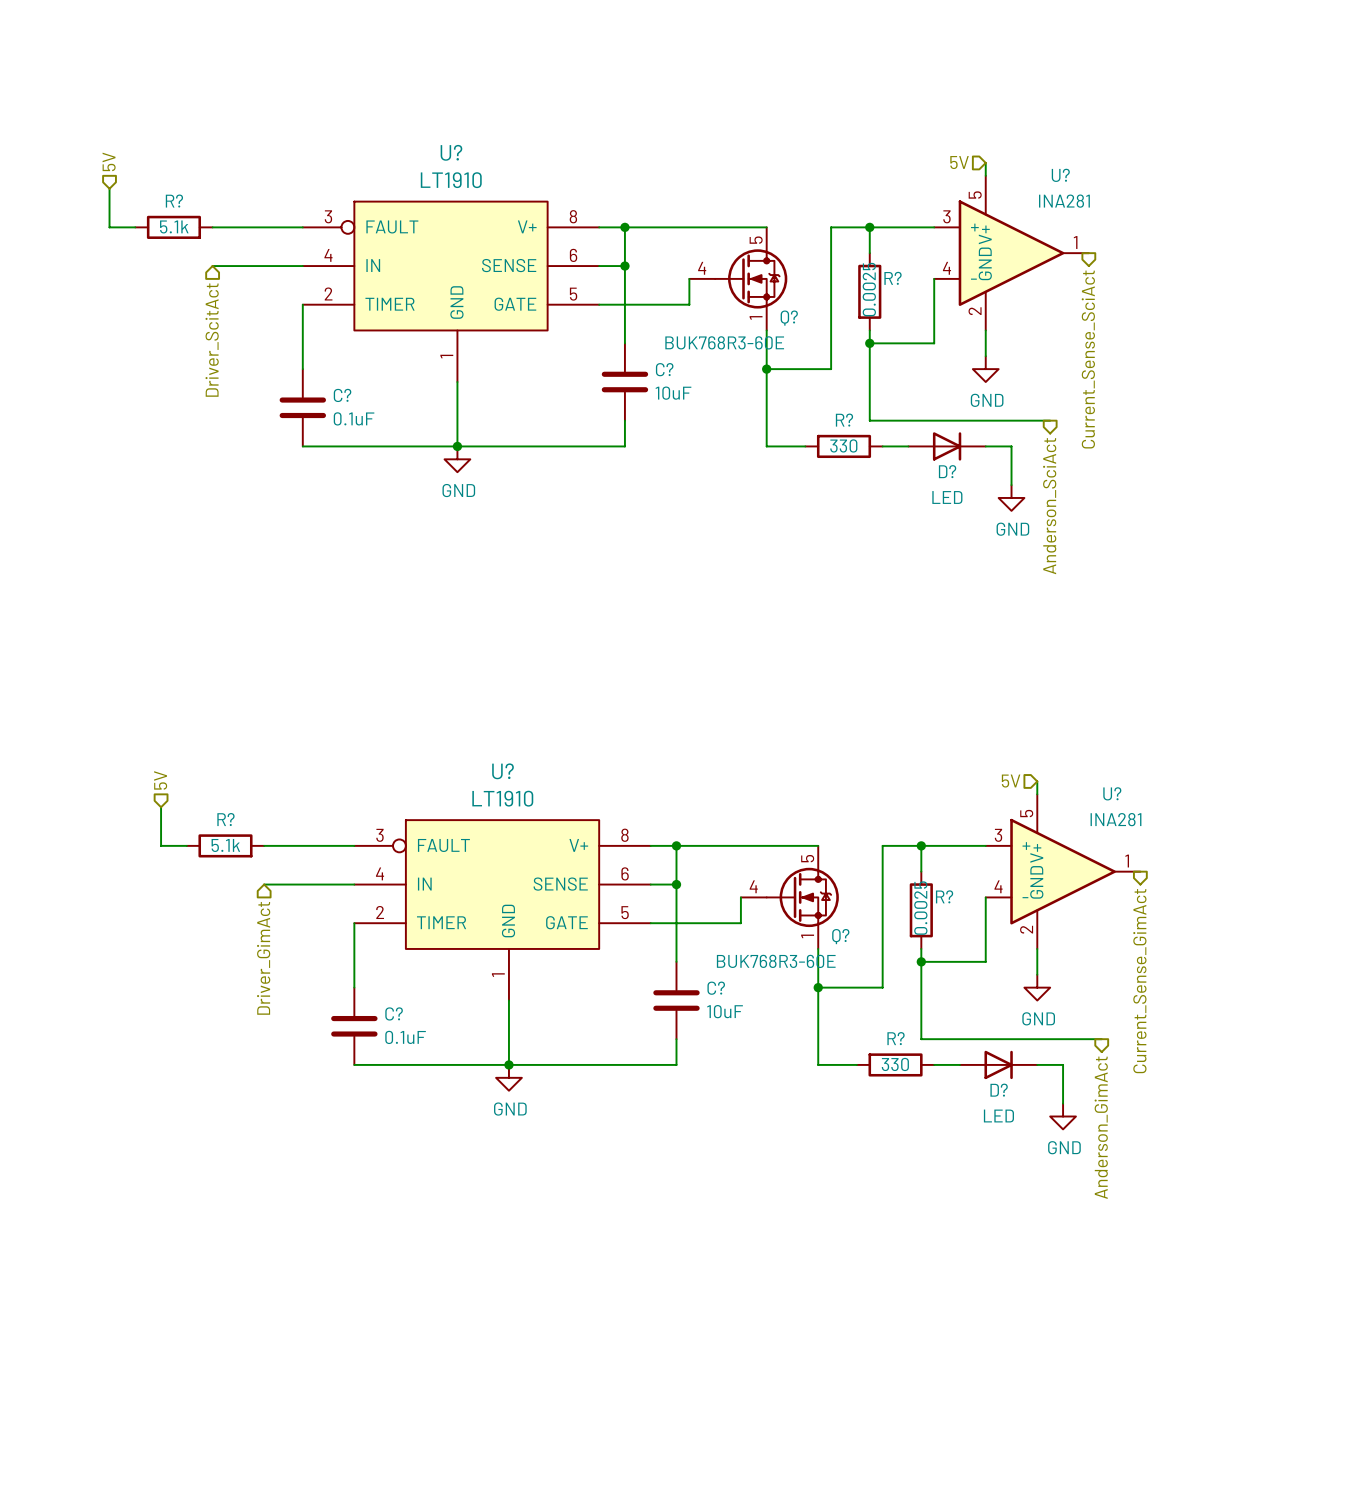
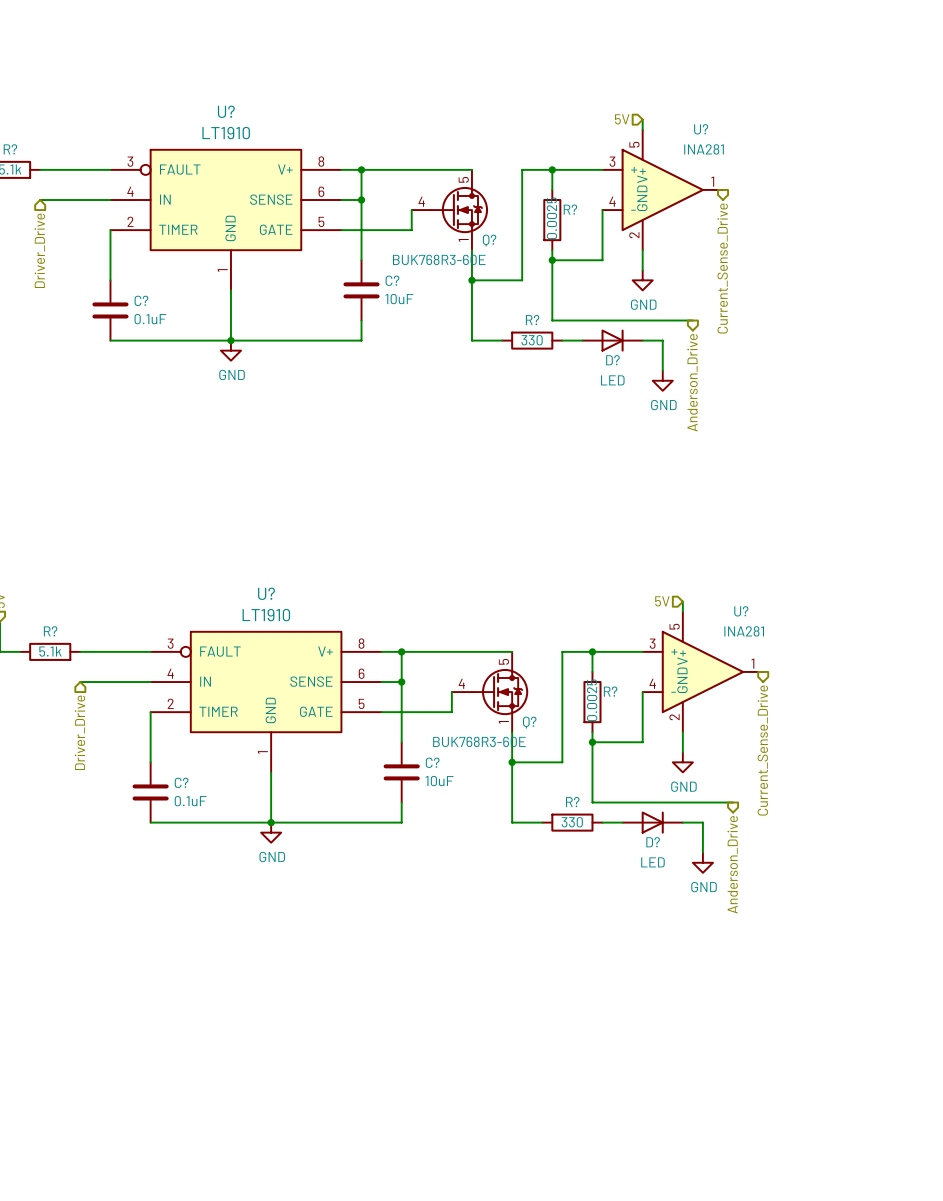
hierarchical label: Driver_ScitAct (212, 340) -> Driver_Drive (39, 250)
hierarchical label: Current_Sense_SciAct (1088, 359) -> Current_Sense_Drive (722, 268)
hierarchical label: Anderson_SciAct (1049, 506) -> Anderson_Drive (692, 382)
hierarchical label: Driver_GimAct (263, 958) -> Driver_Drive (79, 732)
hierarchical label: Current_Sense_GimAct (1139, 981) -> Current_Sense_Drive (762, 750)
hierarchical label: Anderson_GimAct (1101, 1127) -> Anderson_Drive (732, 864)

